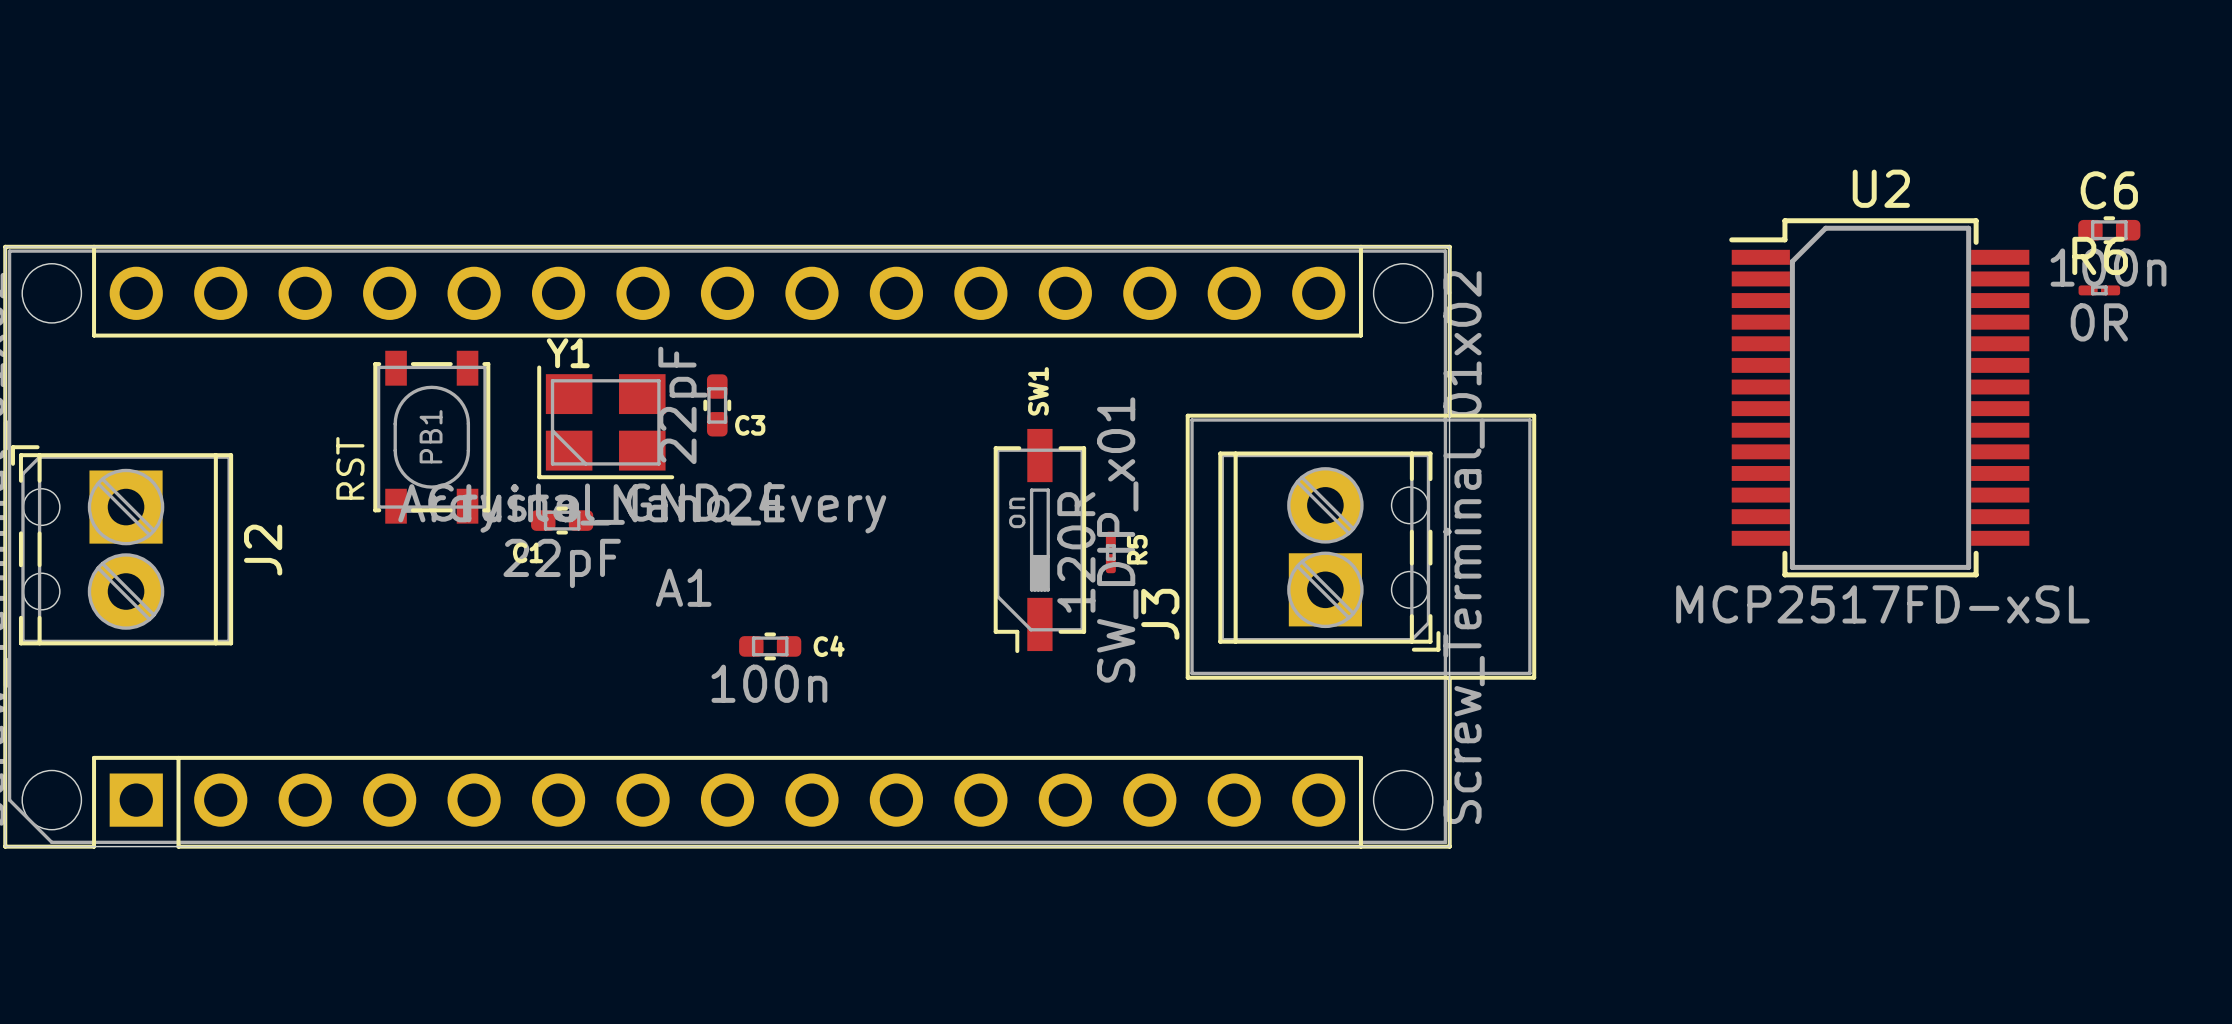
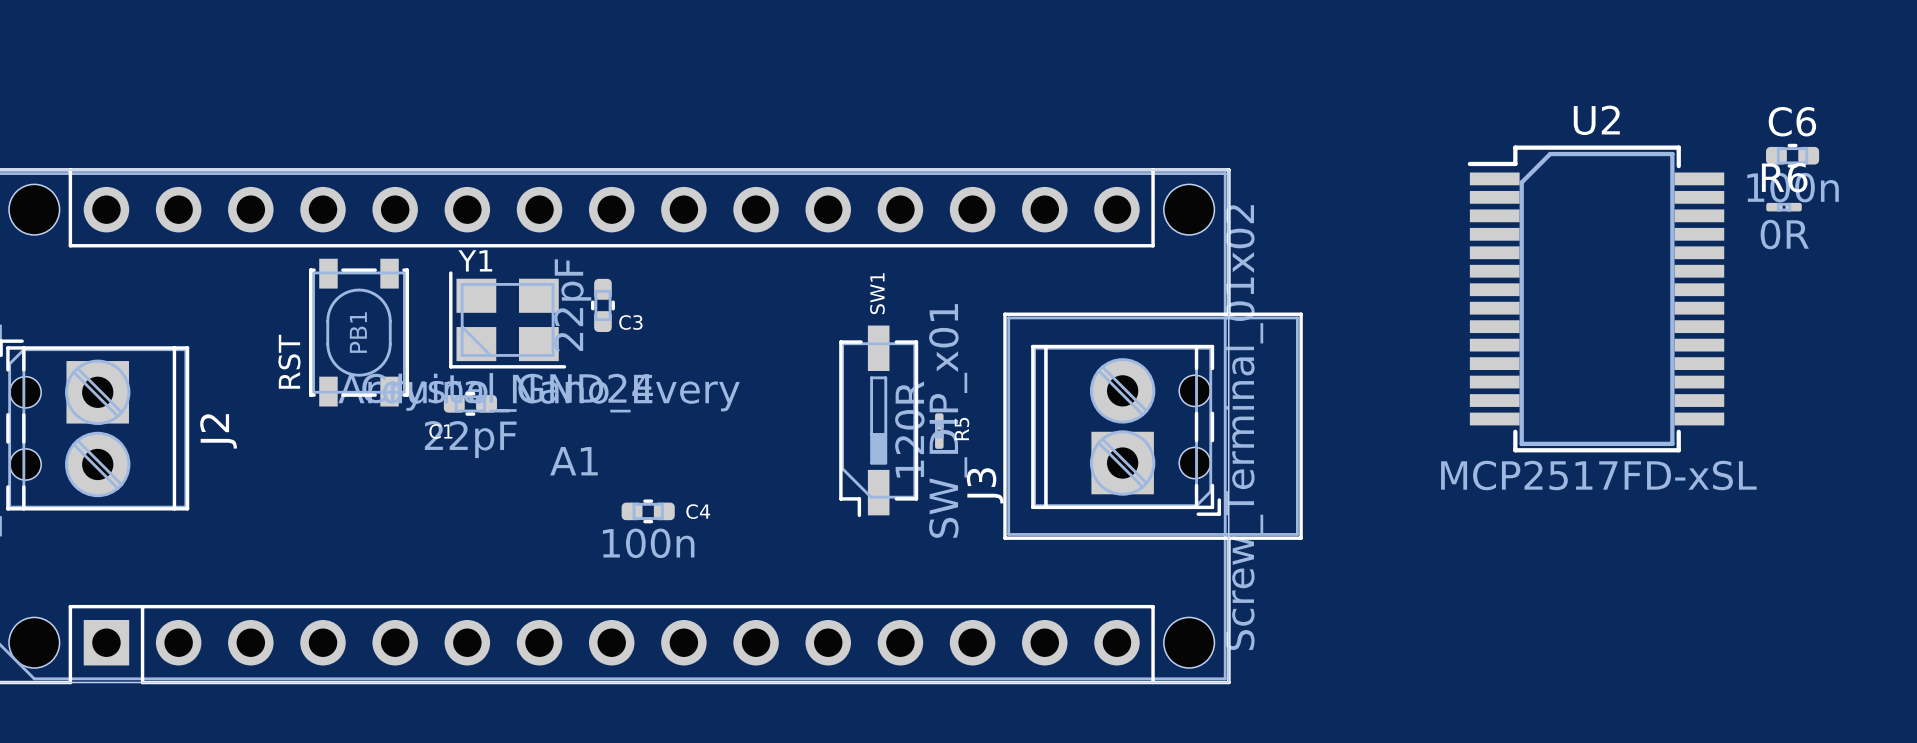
SW1 text: on (1017, 512) -> none

